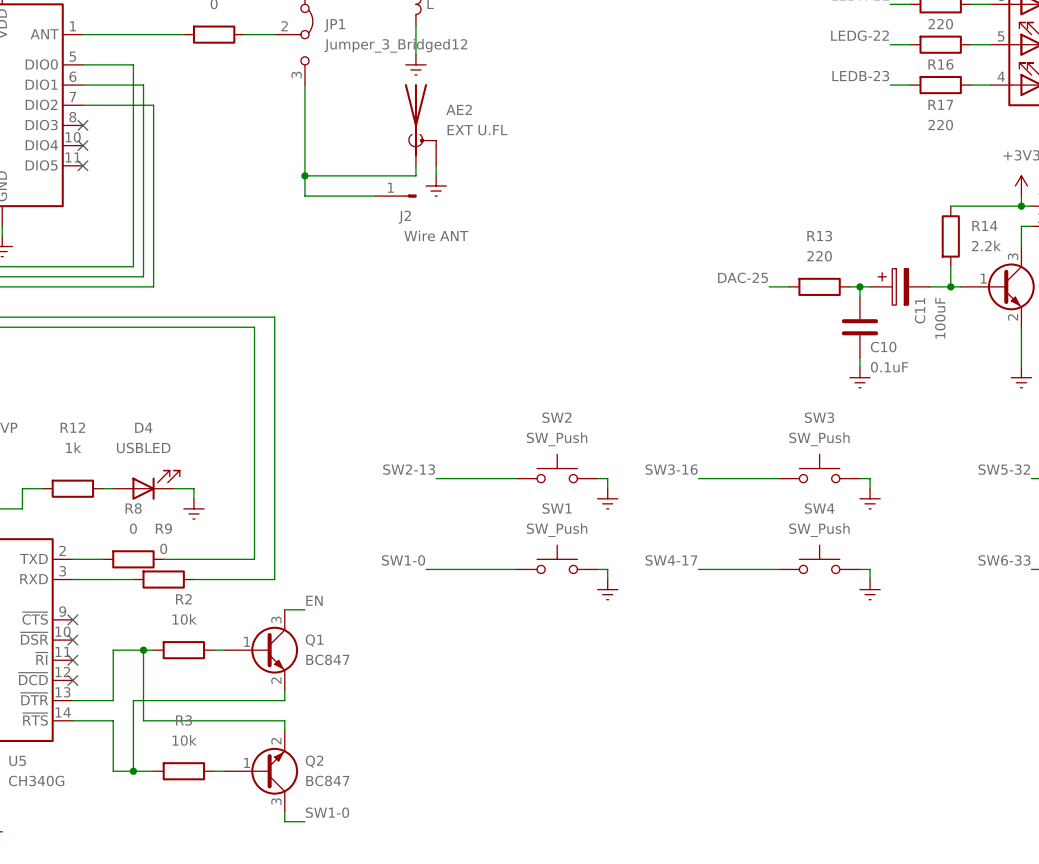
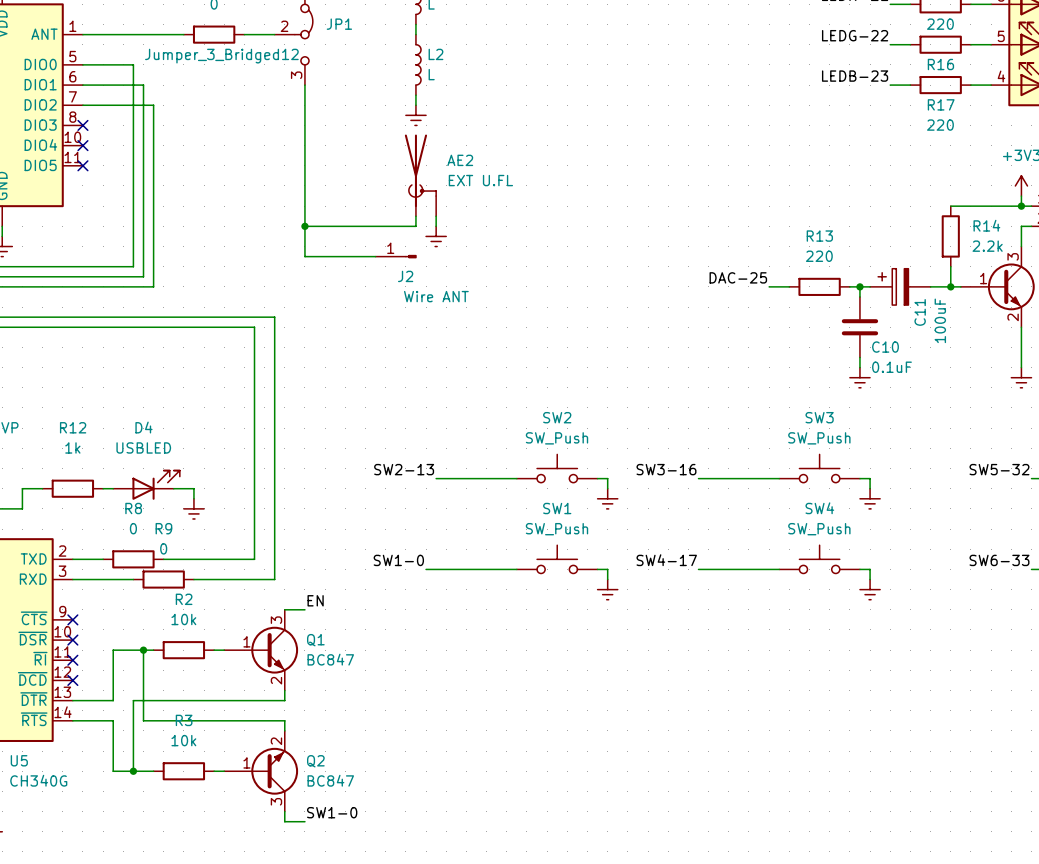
JP1 value position: Jumper_3_Bridged12 (395, 45) -> Jumper_3_Bridged12 (221, 56)
power symbol: (415, 64) -> none
L2: none -> L (418, 64)
power symbol: none -> (415, 115)
AE2 position: (420, 124) -> (420, 175)
wire: (415, 165) (415, 175) (304, 175) -> (415, 216) (415, 226) (304, 226)
wire: (436, 165) (436, 175) -> (436, 216) (436, 226)
junction: (304, 175) -> none
power symbol: (436, 185) -> none
wire: (304, 196) (375, 196) -> (304, 196) (304, 256) (375, 256)
J2 position: (396, 196) -> (396, 256)
junction: none -> (304, 226)
power symbol: none -> (436, 236)

